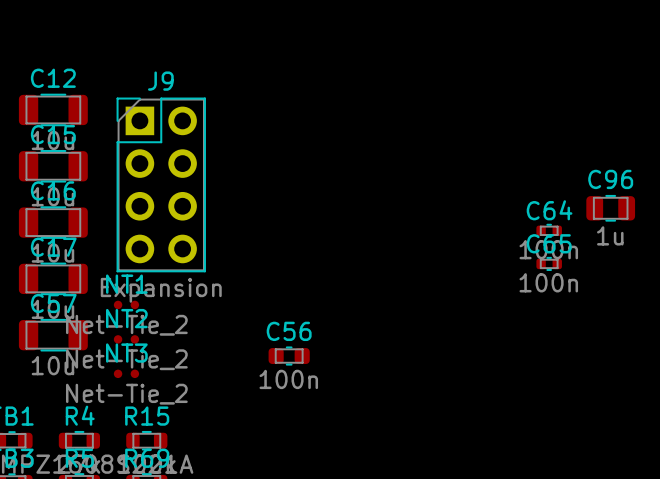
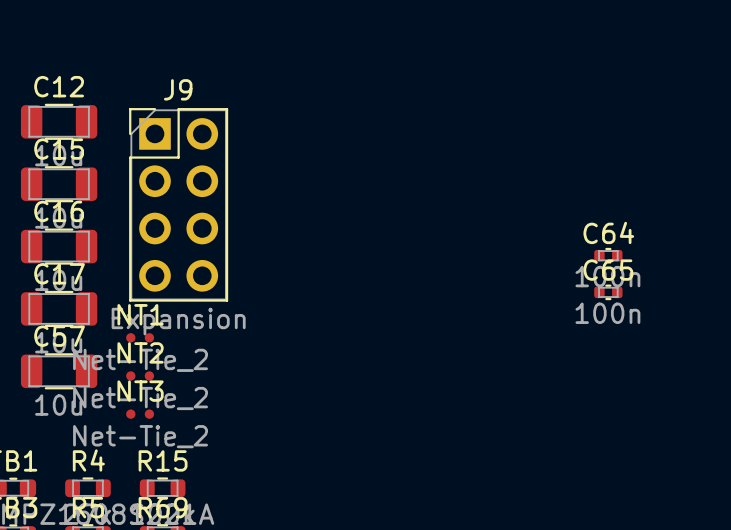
C96: 1u (610, 208) -> none
C56: 100n (289, 356) -> none

